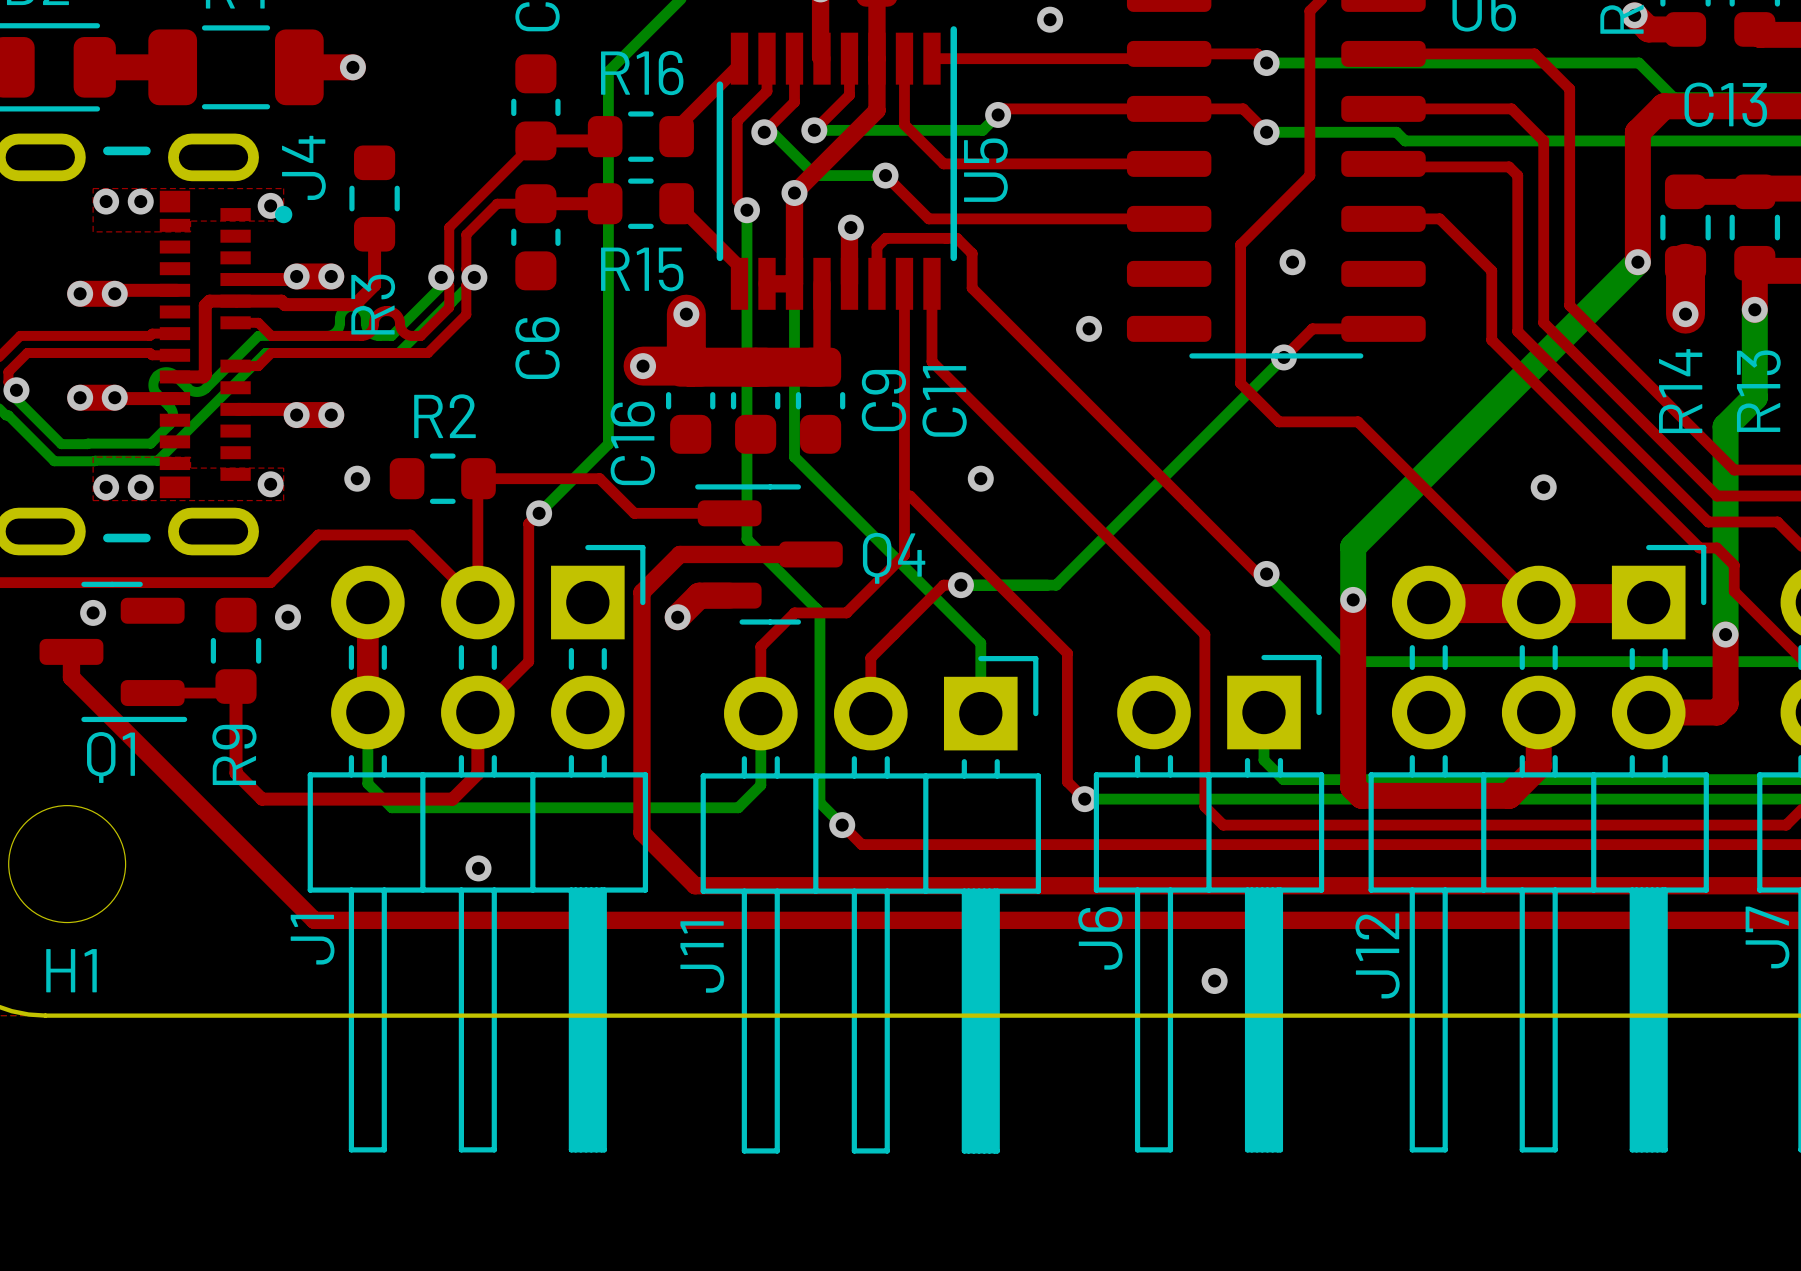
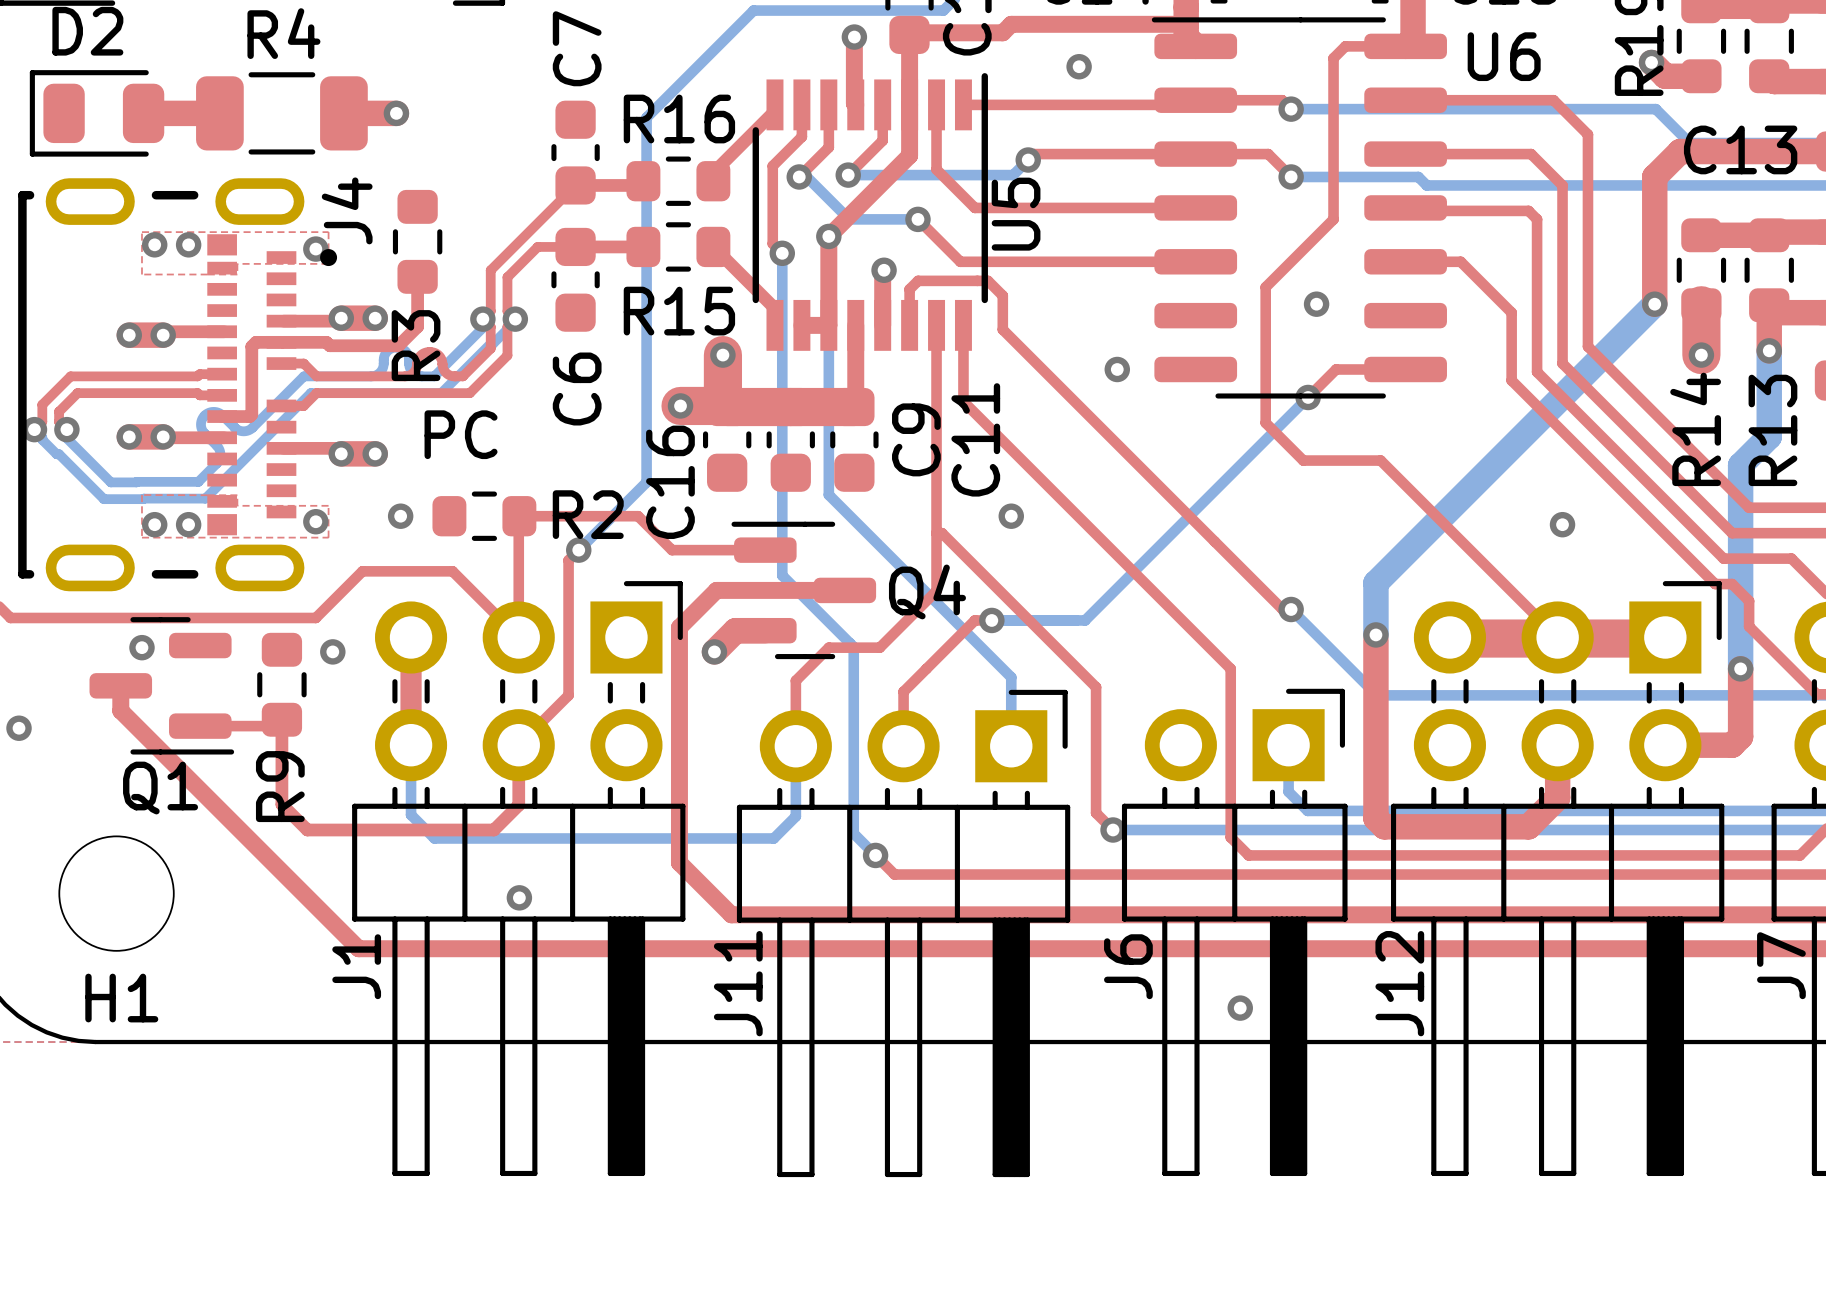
text: none -> PC (461, 434)
R2 name position: R2 (444, 416) -> R2 (588, 514)

